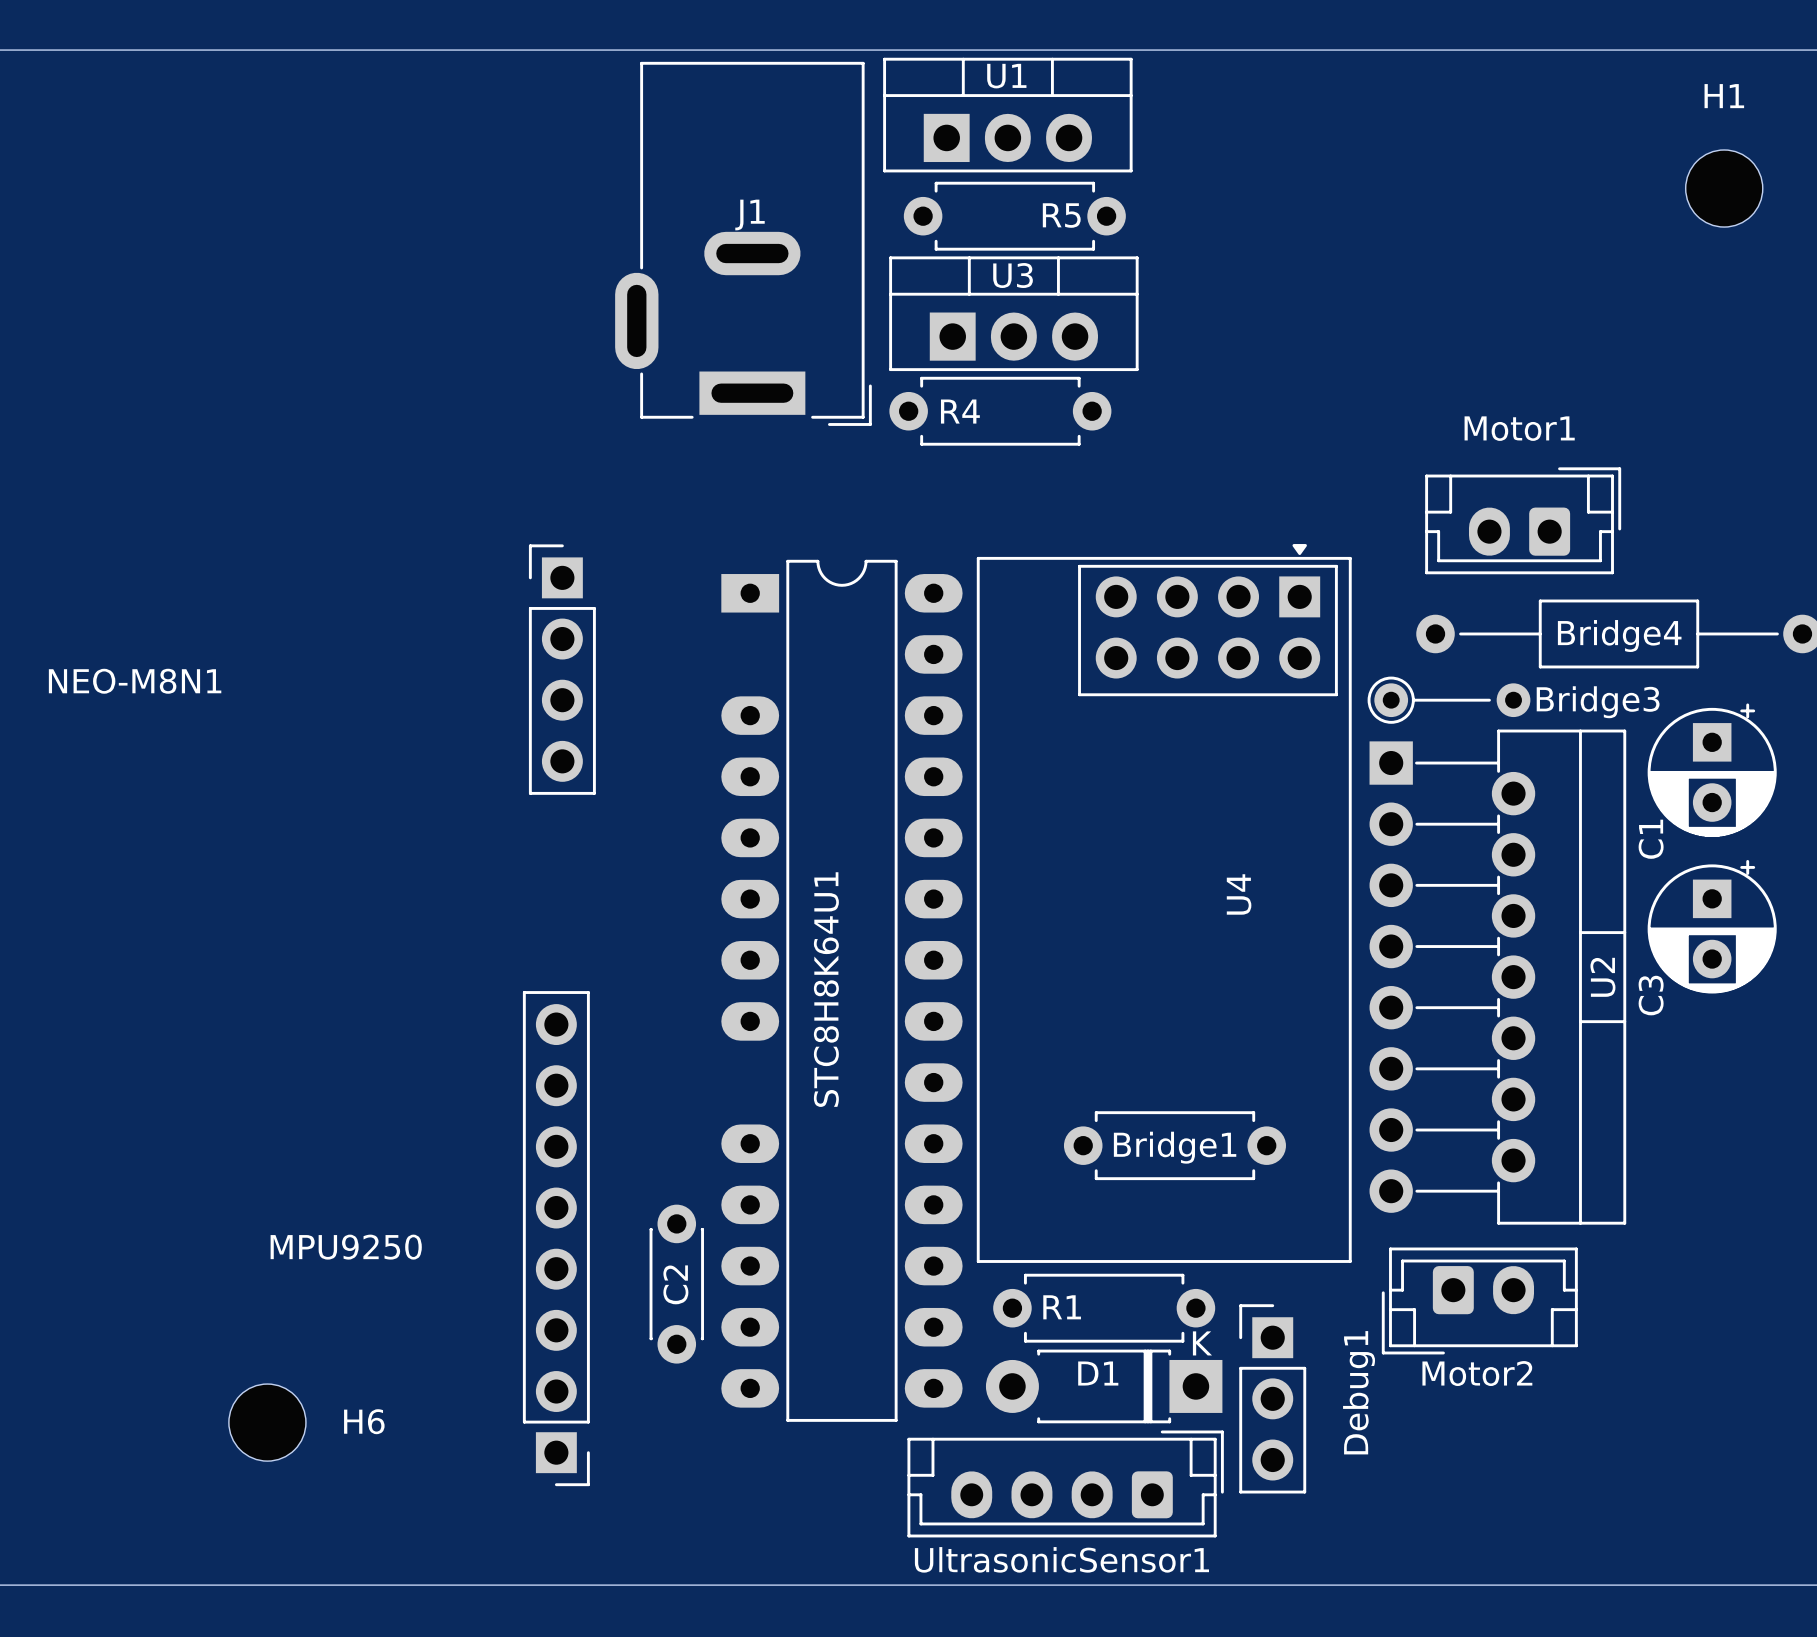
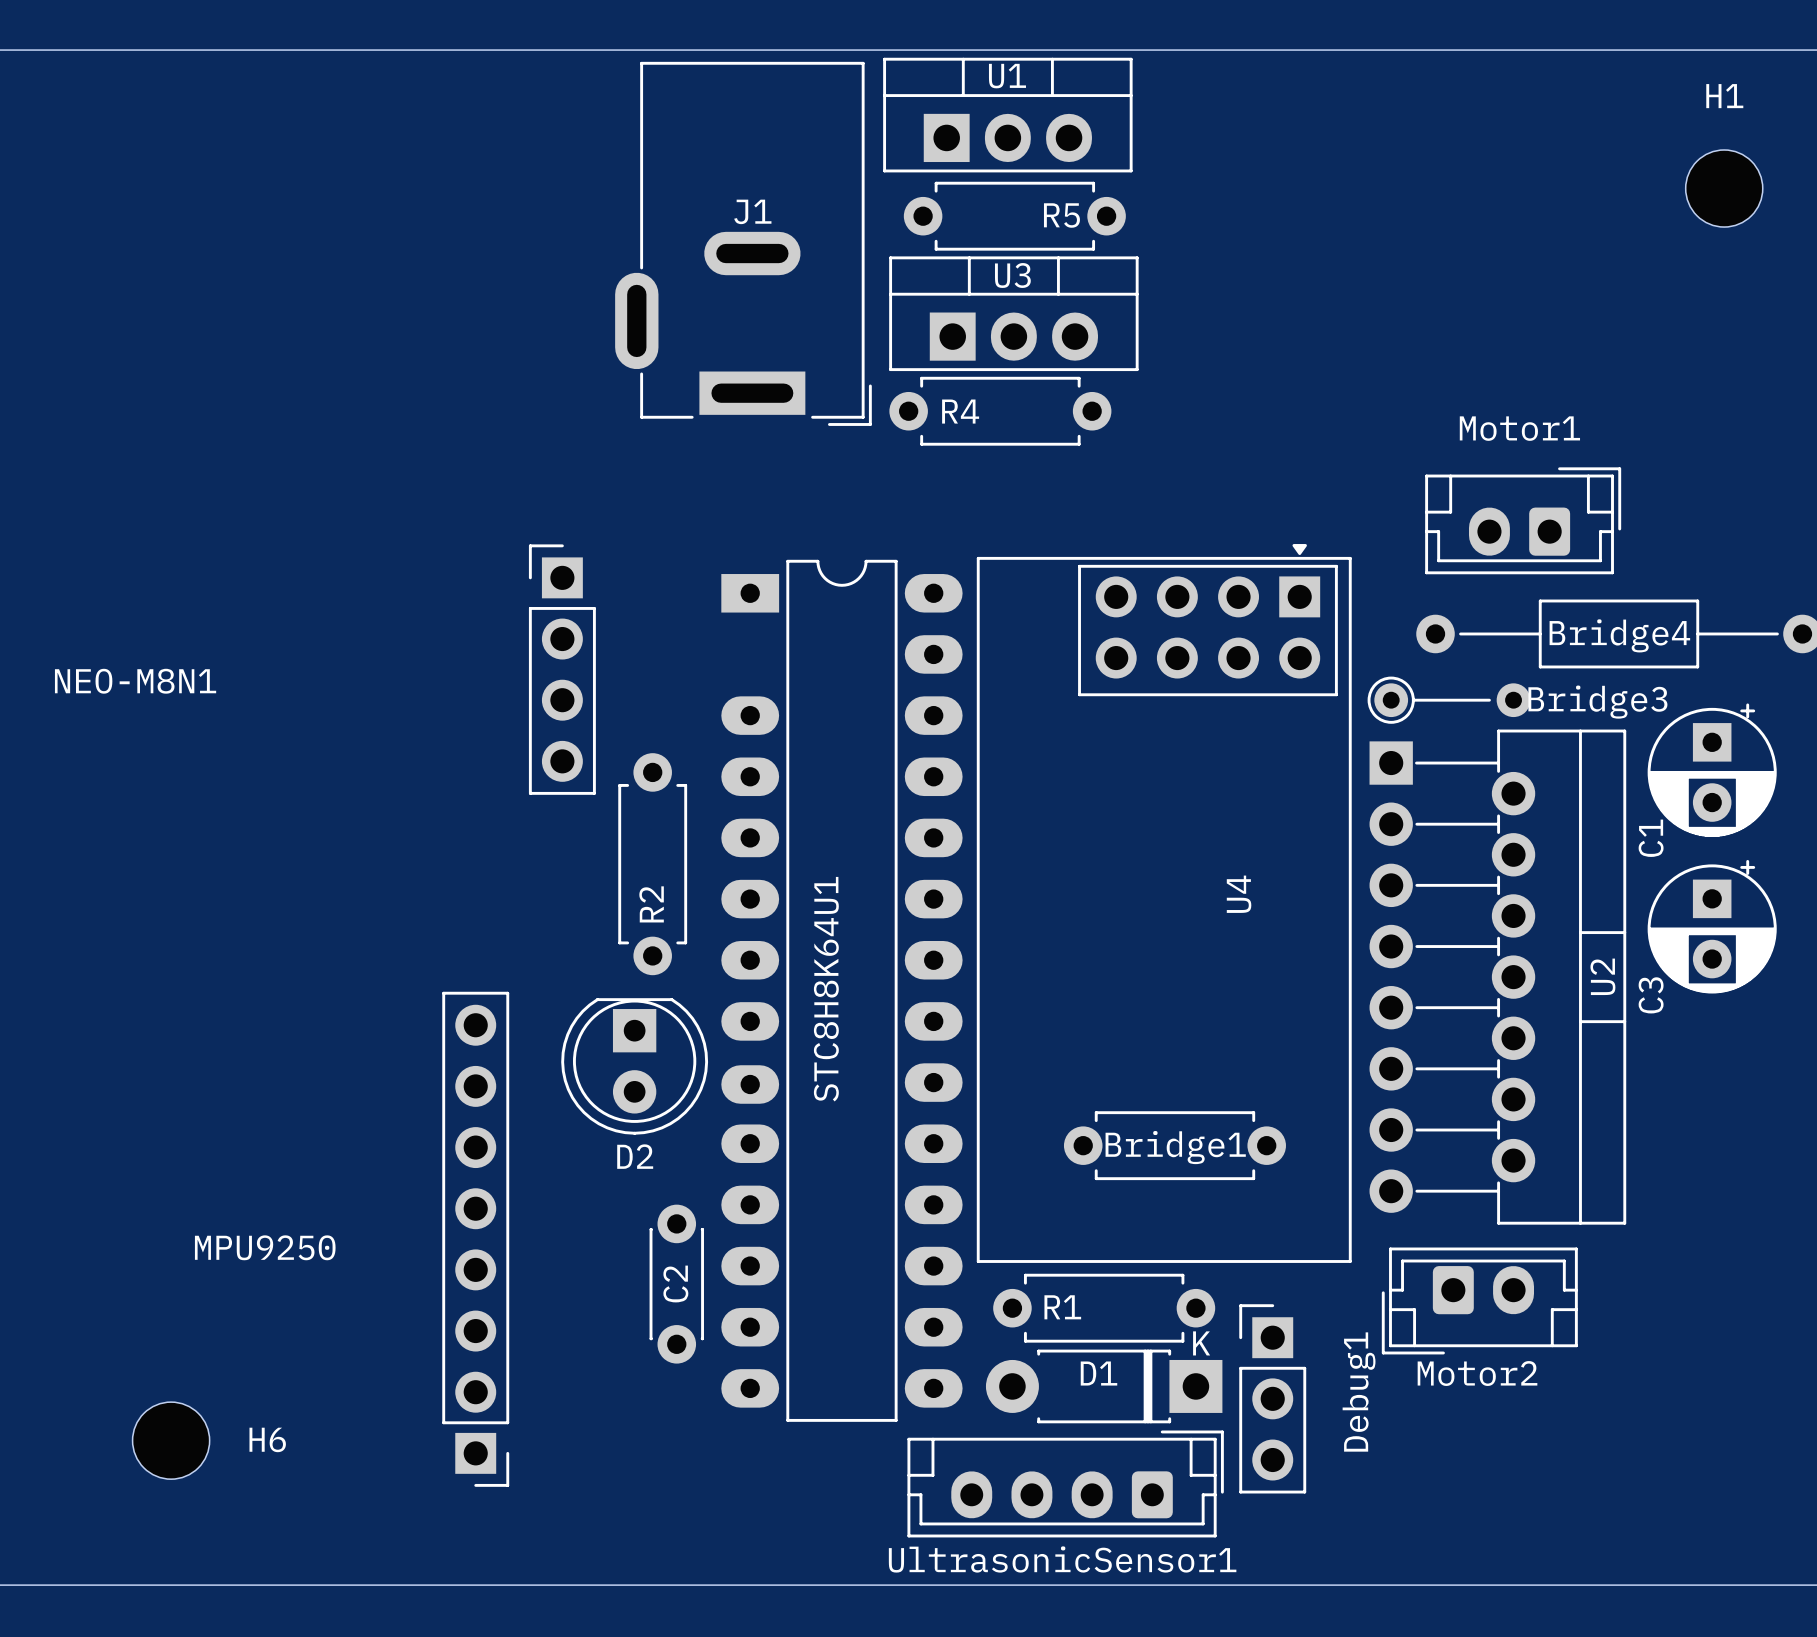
STC8H8K64U1 footprint: [721, 559, 963, 1422] -> [721, 559, 963, 1422]
R2: none -> (652, 864)
D2: none -> (634, 1066)
MPU9250 position: (556, 1238) -> (475, 1239)
H6 position: (267, 1422) -> (171, 1440)

